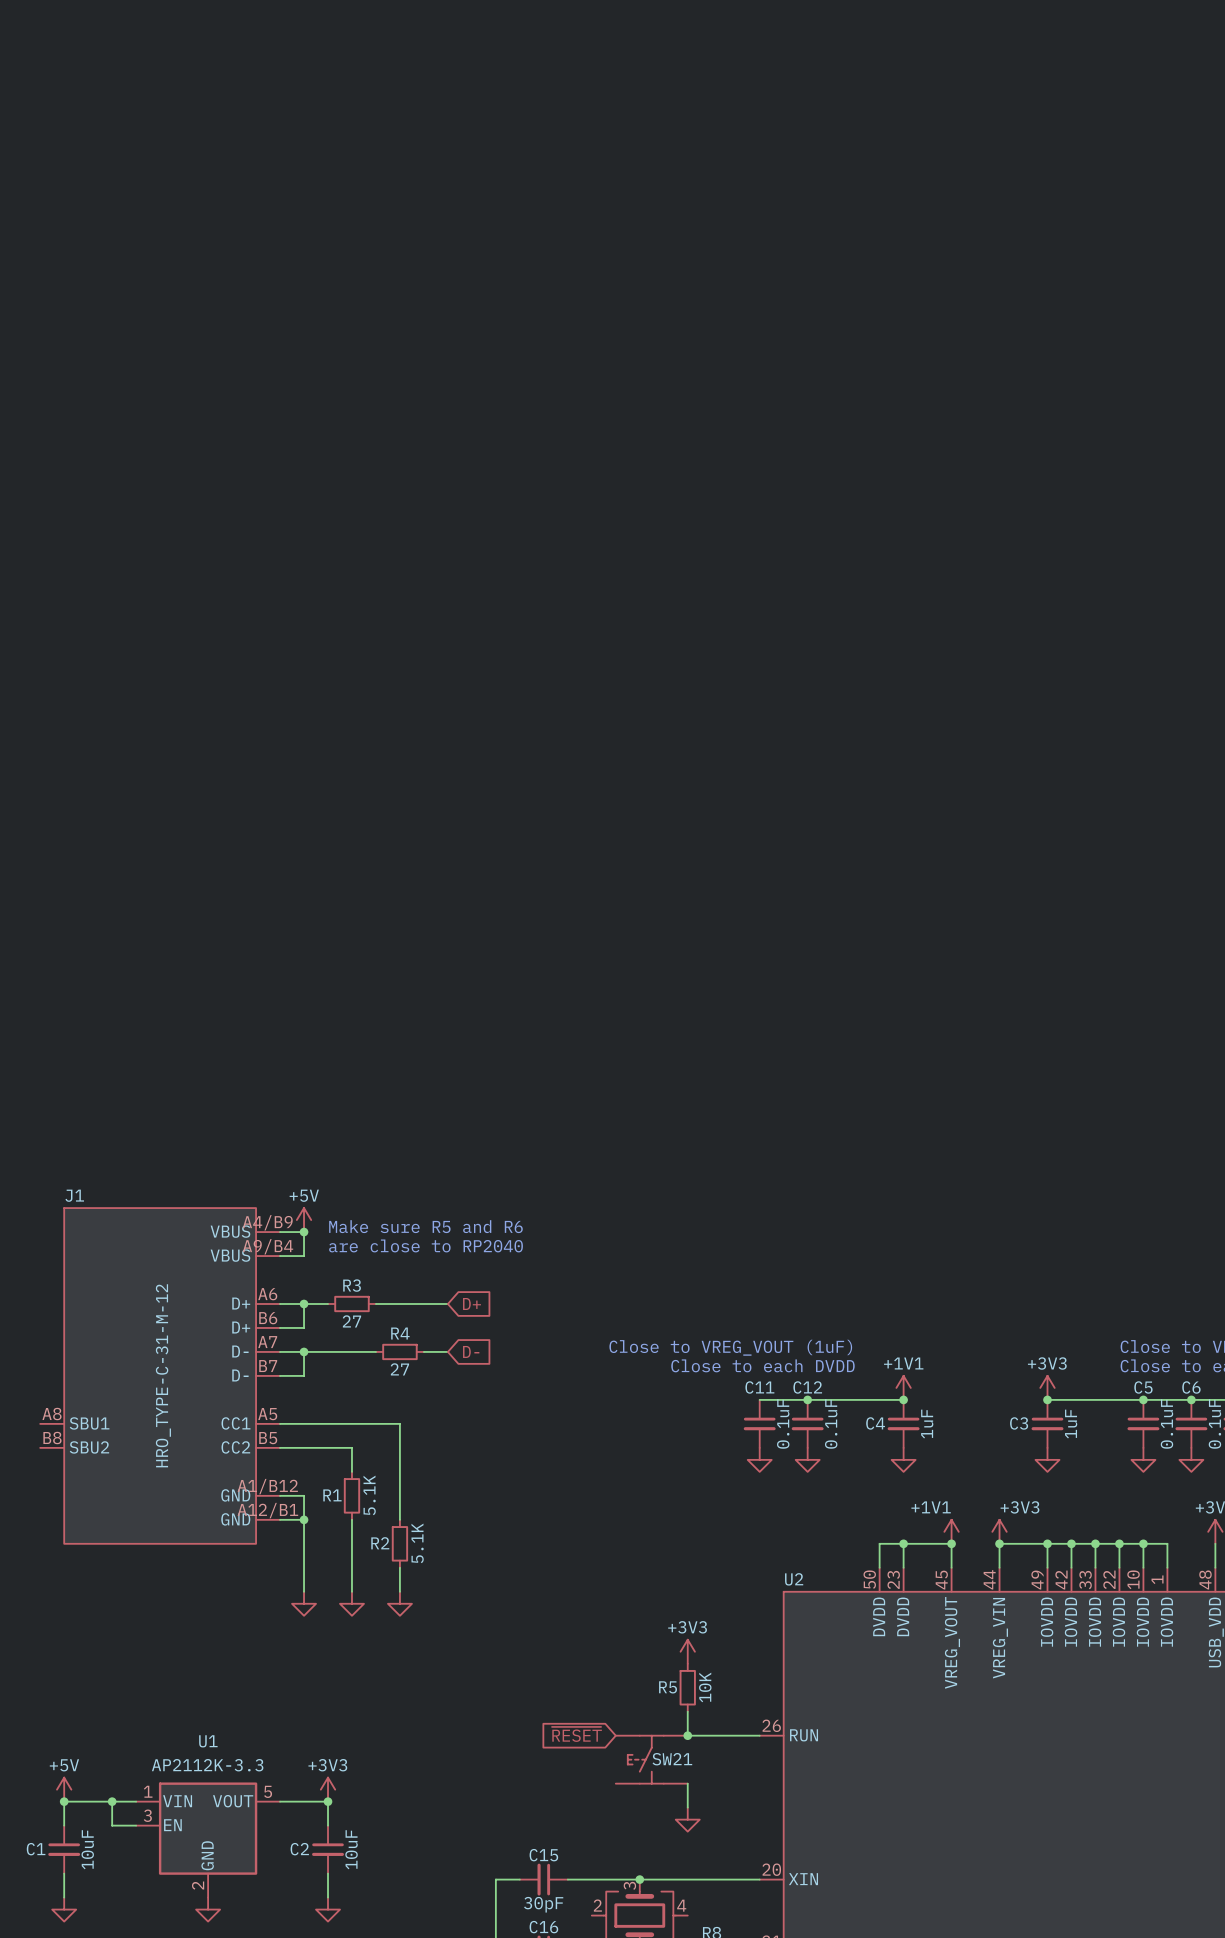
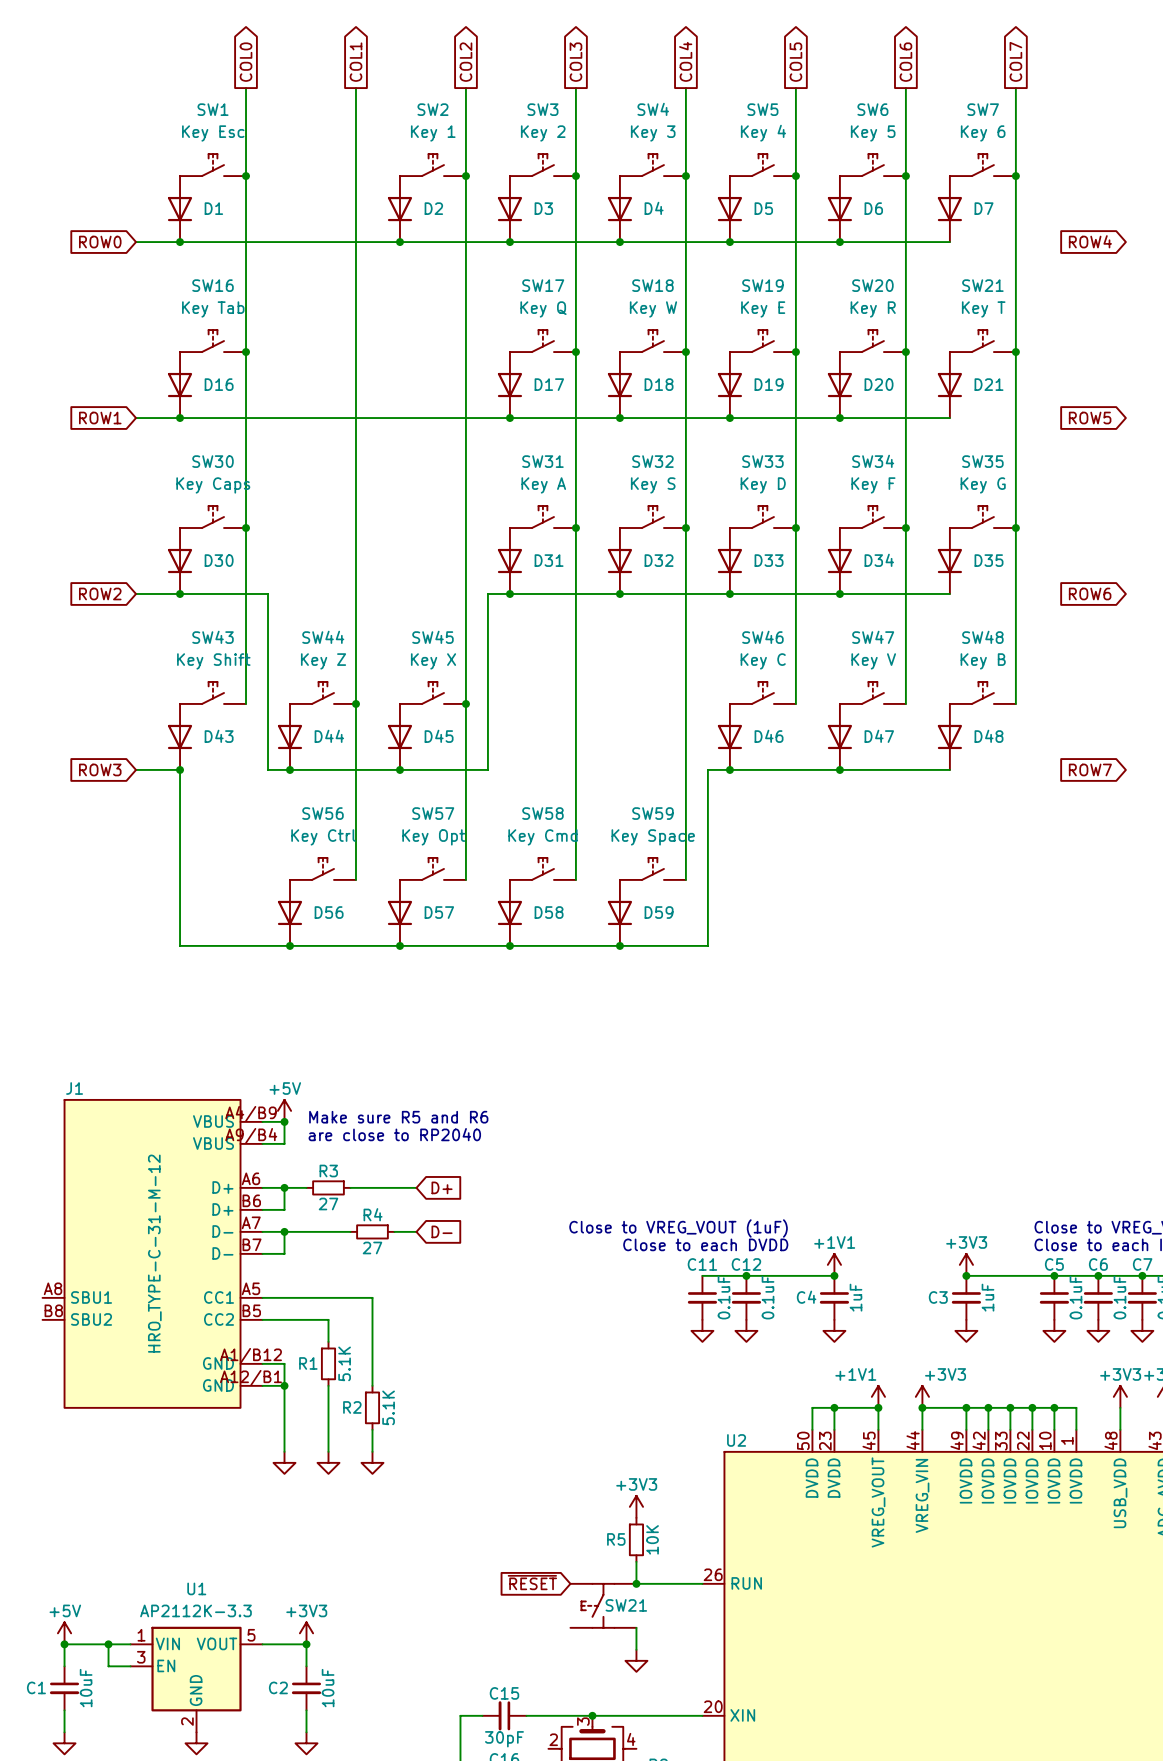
global label: none -> COL0 (246, 62)
global label: none -> COL1 (355, 62)
global label: none -> COL2 (465, 62)
global label: none -> COL3 (575, 62)
global label: none -> COL4 (685, 61)
global label: none -> COL5 (795, 62)
global label: none -> COL6 (905, 62)
global label: none -> COL7 (1015, 61)
wire: none -> (246, 88) (246, 703)
wire: none -> (355, 88) (355, 879)
wire: none -> (465, 88) (465, 879)
wire: none -> (575, 88) (575, 879)
wire: none -> (685, 88) (685, 879)
wire: none -> (795, 88) (795, 703)
wire: none -> (905, 88) (905, 703)
wire: none -> (1015, 88) (1015, 703)
SW1: none -> Key Esc (213, 165)
SW2: none -> Key 1 (432, 165)
SW3: none -> Key 2 (542, 165)
SW4: none -> Key 3 (652, 165)
SW5: none -> Key 4 (762, 165)
SW6: none -> Key 5 (872, 165)
SW7: none -> Key 6 (982, 165)
junction: none -> (246, 176)
junction: none -> (465, 176)
junction: none -> (575, 176)
junction: none -> (685, 176)
junction: none -> (795, 176)
junction: none -> (905, 176)
junction: none -> (1015, 176)
D1: none -> (180, 209)
D2: none -> (399, 209)
D3: none -> (509, 209)
D4: none -> (619, 209)
D5: none -> (729, 209)
D6: none -> (839, 209)
D7: none -> (949, 209)
global label: none -> ROW0 (100, 242)
wire: none -> (136, 242) (949, 242)
junction: none -> (180, 242)
junction: none -> (399, 242)
junction: none -> (509, 242)
junction: none -> (619, 242)
junction: none -> (729, 242)
junction: none -> (839, 242)
global label: none -> ROW4 (1090, 241)
SW16: none -> Key Tab (213, 341)
SW17: none -> Key Q (542, 341)
SW18: none -> Key W (652, 341)
SW19: none -> Key E (762, 341)
SW20: none -> Key R (872, 341)
SW21: none -> Key T (982, 341)
junction: none -> (246, 352)
junction: none -> (575, 352)
junction: none -> (685, 352)
junction: none -> (795, 352)
junction: none -> (905, 352)
junction: none -> (1015, 352)
D16: none -> (180, 385)
D17: none -> (509, 385)
D18: none -> (619, 385)
D19: none -> (729, 385)
D20: none -> (839, 385)
D21: none -> (949, 385)
global label: none -> ROW1 (100, 418)
wire: none -> (136, 418) (949, 418)
junction: none -> (180, 418)
junction: none -> (509, 418)
junction: none -> (619, 418)
junction: none -> (729, 418)
junction: none -> (839, 418)
global label: none -> ROW5 (1090, 418)
SW30: none -> Key Caps (213, 517)
SW31: none -> Key A (542, 517)
SW32: none -> Key S (652, 517)
SW33: none -> Key D (762, 517)
SW34: none -> Key F (872, 517)
SW35: none -> Key G (982, 517)
junction: none -> (246, 528)
junction: none -> (575, 528)
junction: none -> (685, 528)
junction: none -> (795, 528)
junction: none -> (905, 528)
junction: none -> (1015, 528)
D30: none -> (180, 560)
D31: none -> (509, 560)
D32: none -> (619, 560)
D33: none -> (729, 560)
D34: none -> (839, 560)
D35: none -> (949, 560)
global label: none -> ROW2 (100, 593)
wire: none -> (136, 593) (268, 593) (268, 769) (487, 769) (487, 593) (949, 593)
junction: none -> (180, 593)
junction: none -> (509, 593)
junction: none -> (619, 593)
junction: none -> (729, 593)
junction: none -> (839, 593)
global label: none -> ROW6 (1090, 593)
SW43: none -> Key Shift (213, 692)
SW44: none -> Key Z (323, 692)
SW45: none -> Key X (432, 692)
SW46: none -> Key C (762, 692)
SW47: none -> Key V (872, 692)
SW48: none -> Key B (982, 692)
junction: none -> (355, 703)
junction: none -> (465, 703)
D43: none -> (180, 736)
D44: none -> (290, 736)
D45: none -> (399, 736)
D46: none -> (729, 736)
D47: none -> (839, 736)
D48: none -> (949, 736)
global label: none -> ROW3 (100, 769)
wire: none -> (136, 769) (180, 769) (180, 945) (707, 945) (707, 769) (949, 769)
junction: none -> (180, 769)
junction: none -> (290, 769)
junction: none -> (399, 769)
junction: none -> (729, 769)
junction: none -> (839, 769)
global label: none -> ROW7 (1090, 769)
SW56: none -> Key Ctrl (323, 868)
SW57: none -> Key Opt (432, 868)
SW58: none -> Key Cmd (542, 868)
SW59: none -> Key Space (652, 868)
D56: none -> (290, 912)
D57: none -> (399, 912)
D58: none -> (509, 912)
D59: none -> (619, 912)
junction: none -> (290, 945)
junction: none -> (399, 945)
junction: none -> (509, 945)
junction: none -> (619, 945)

